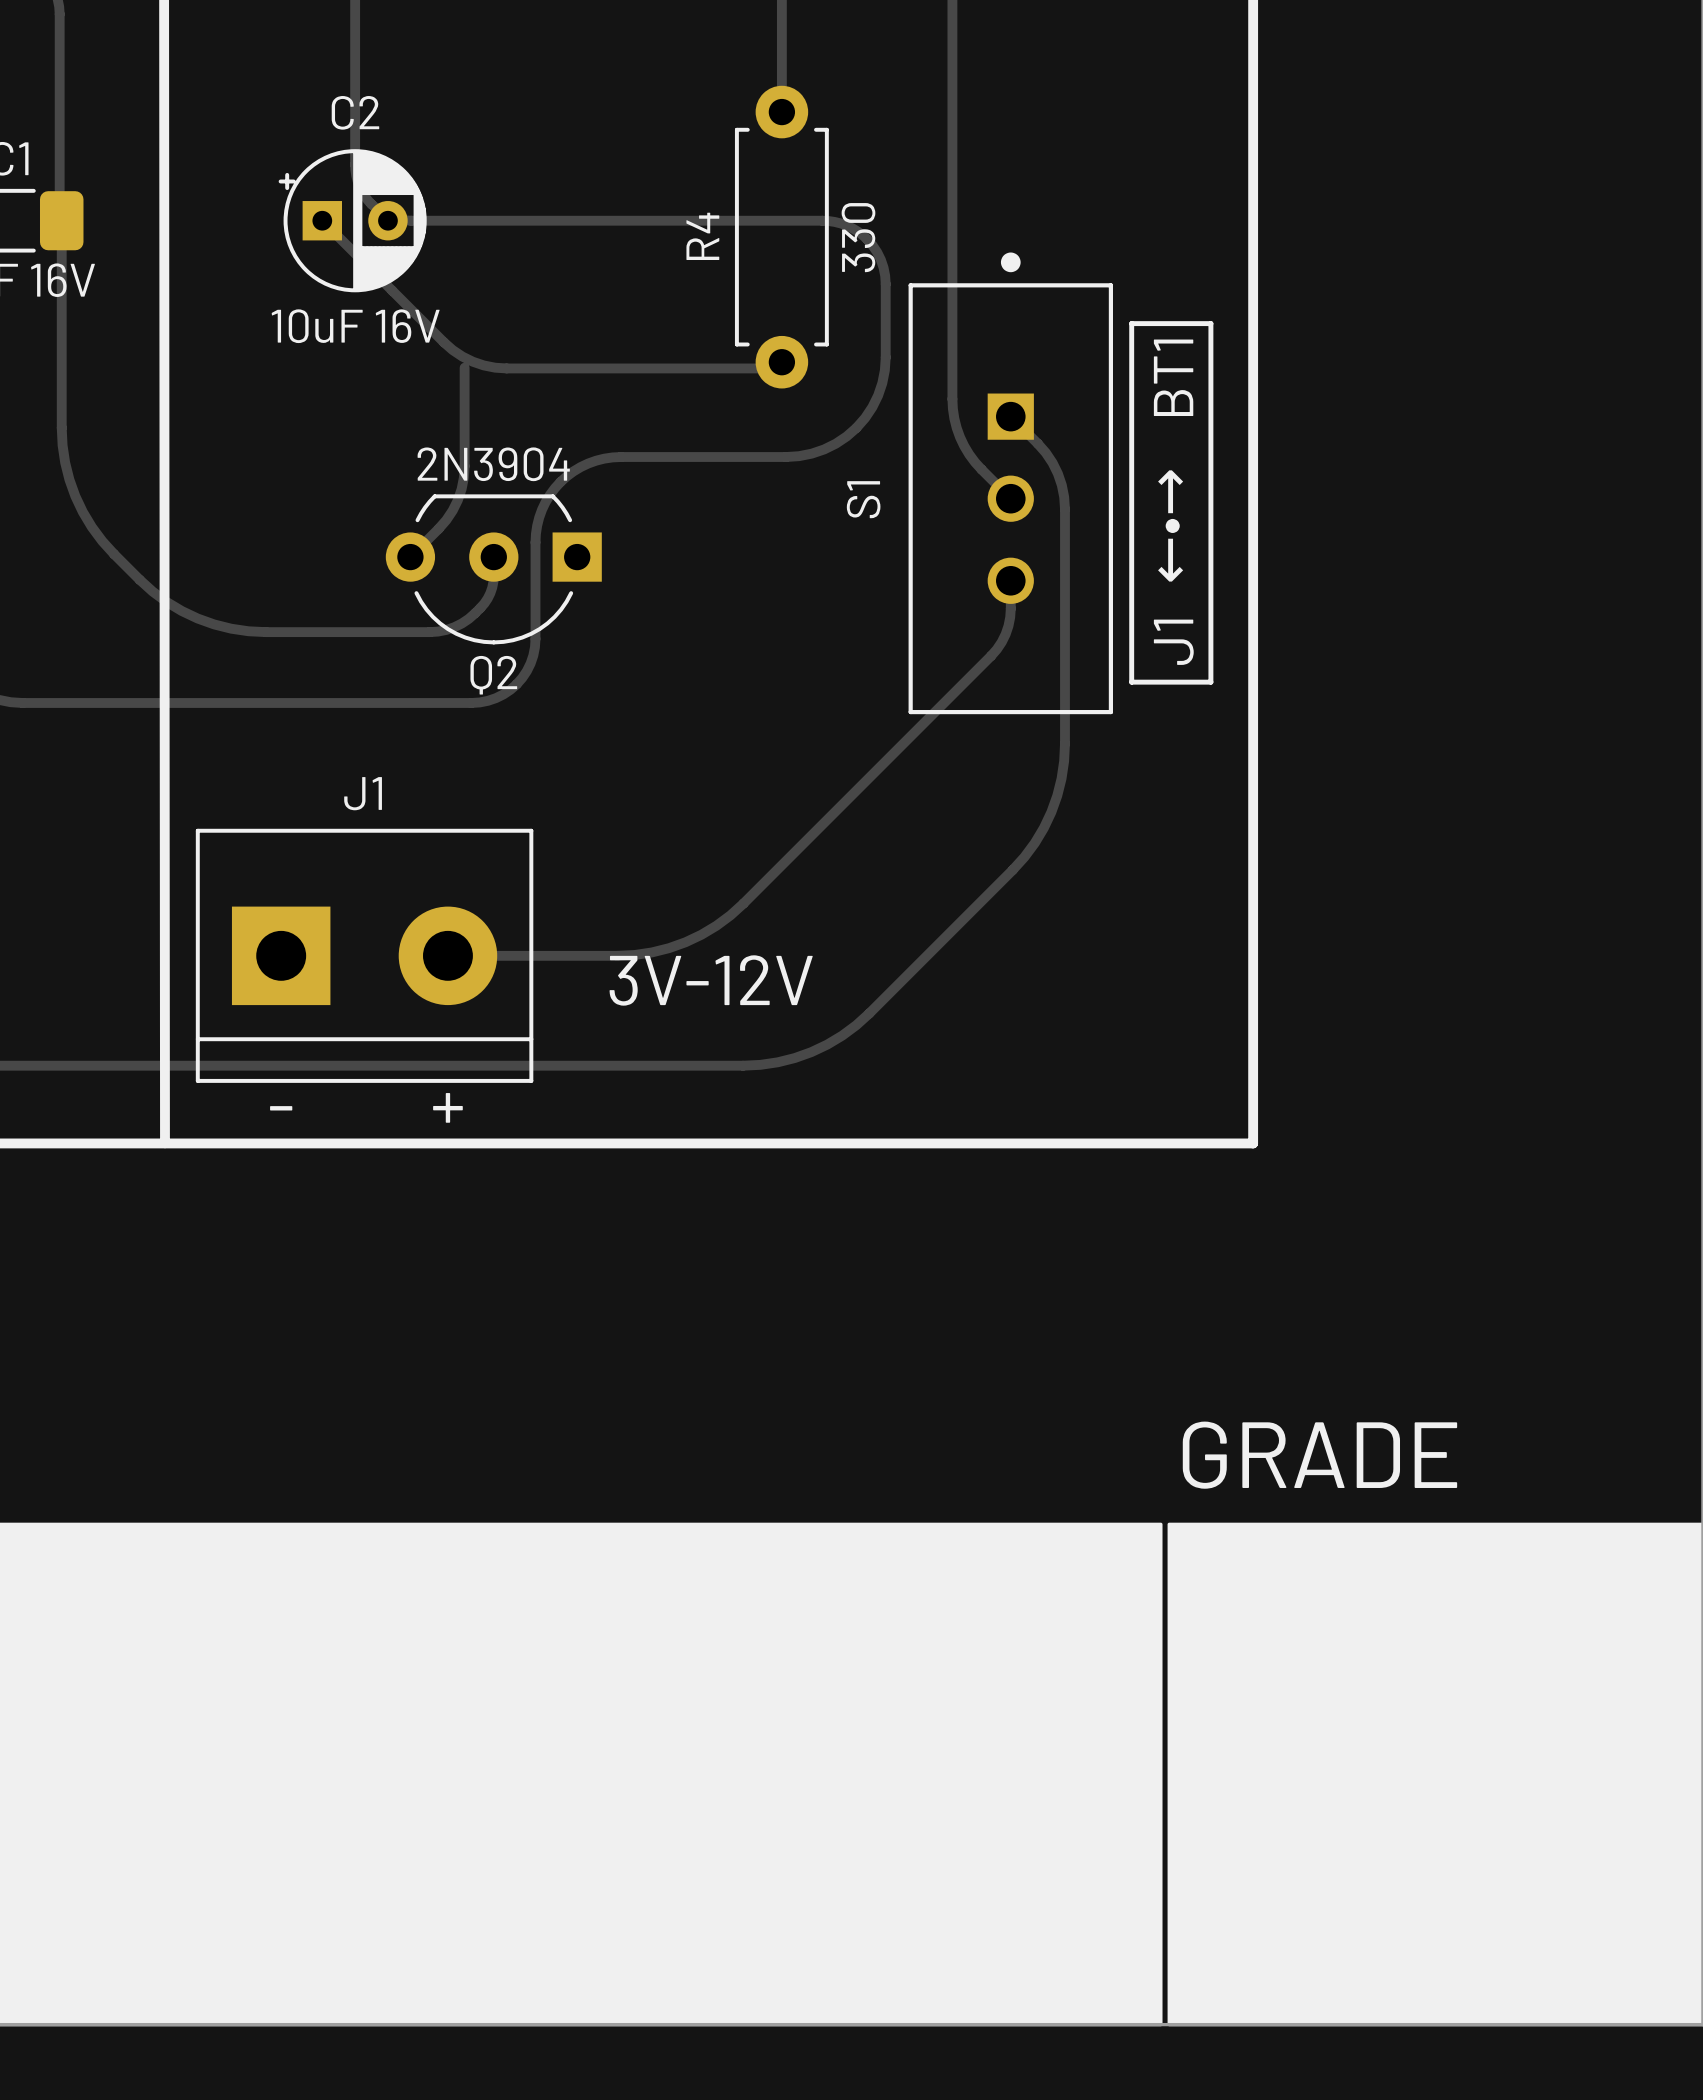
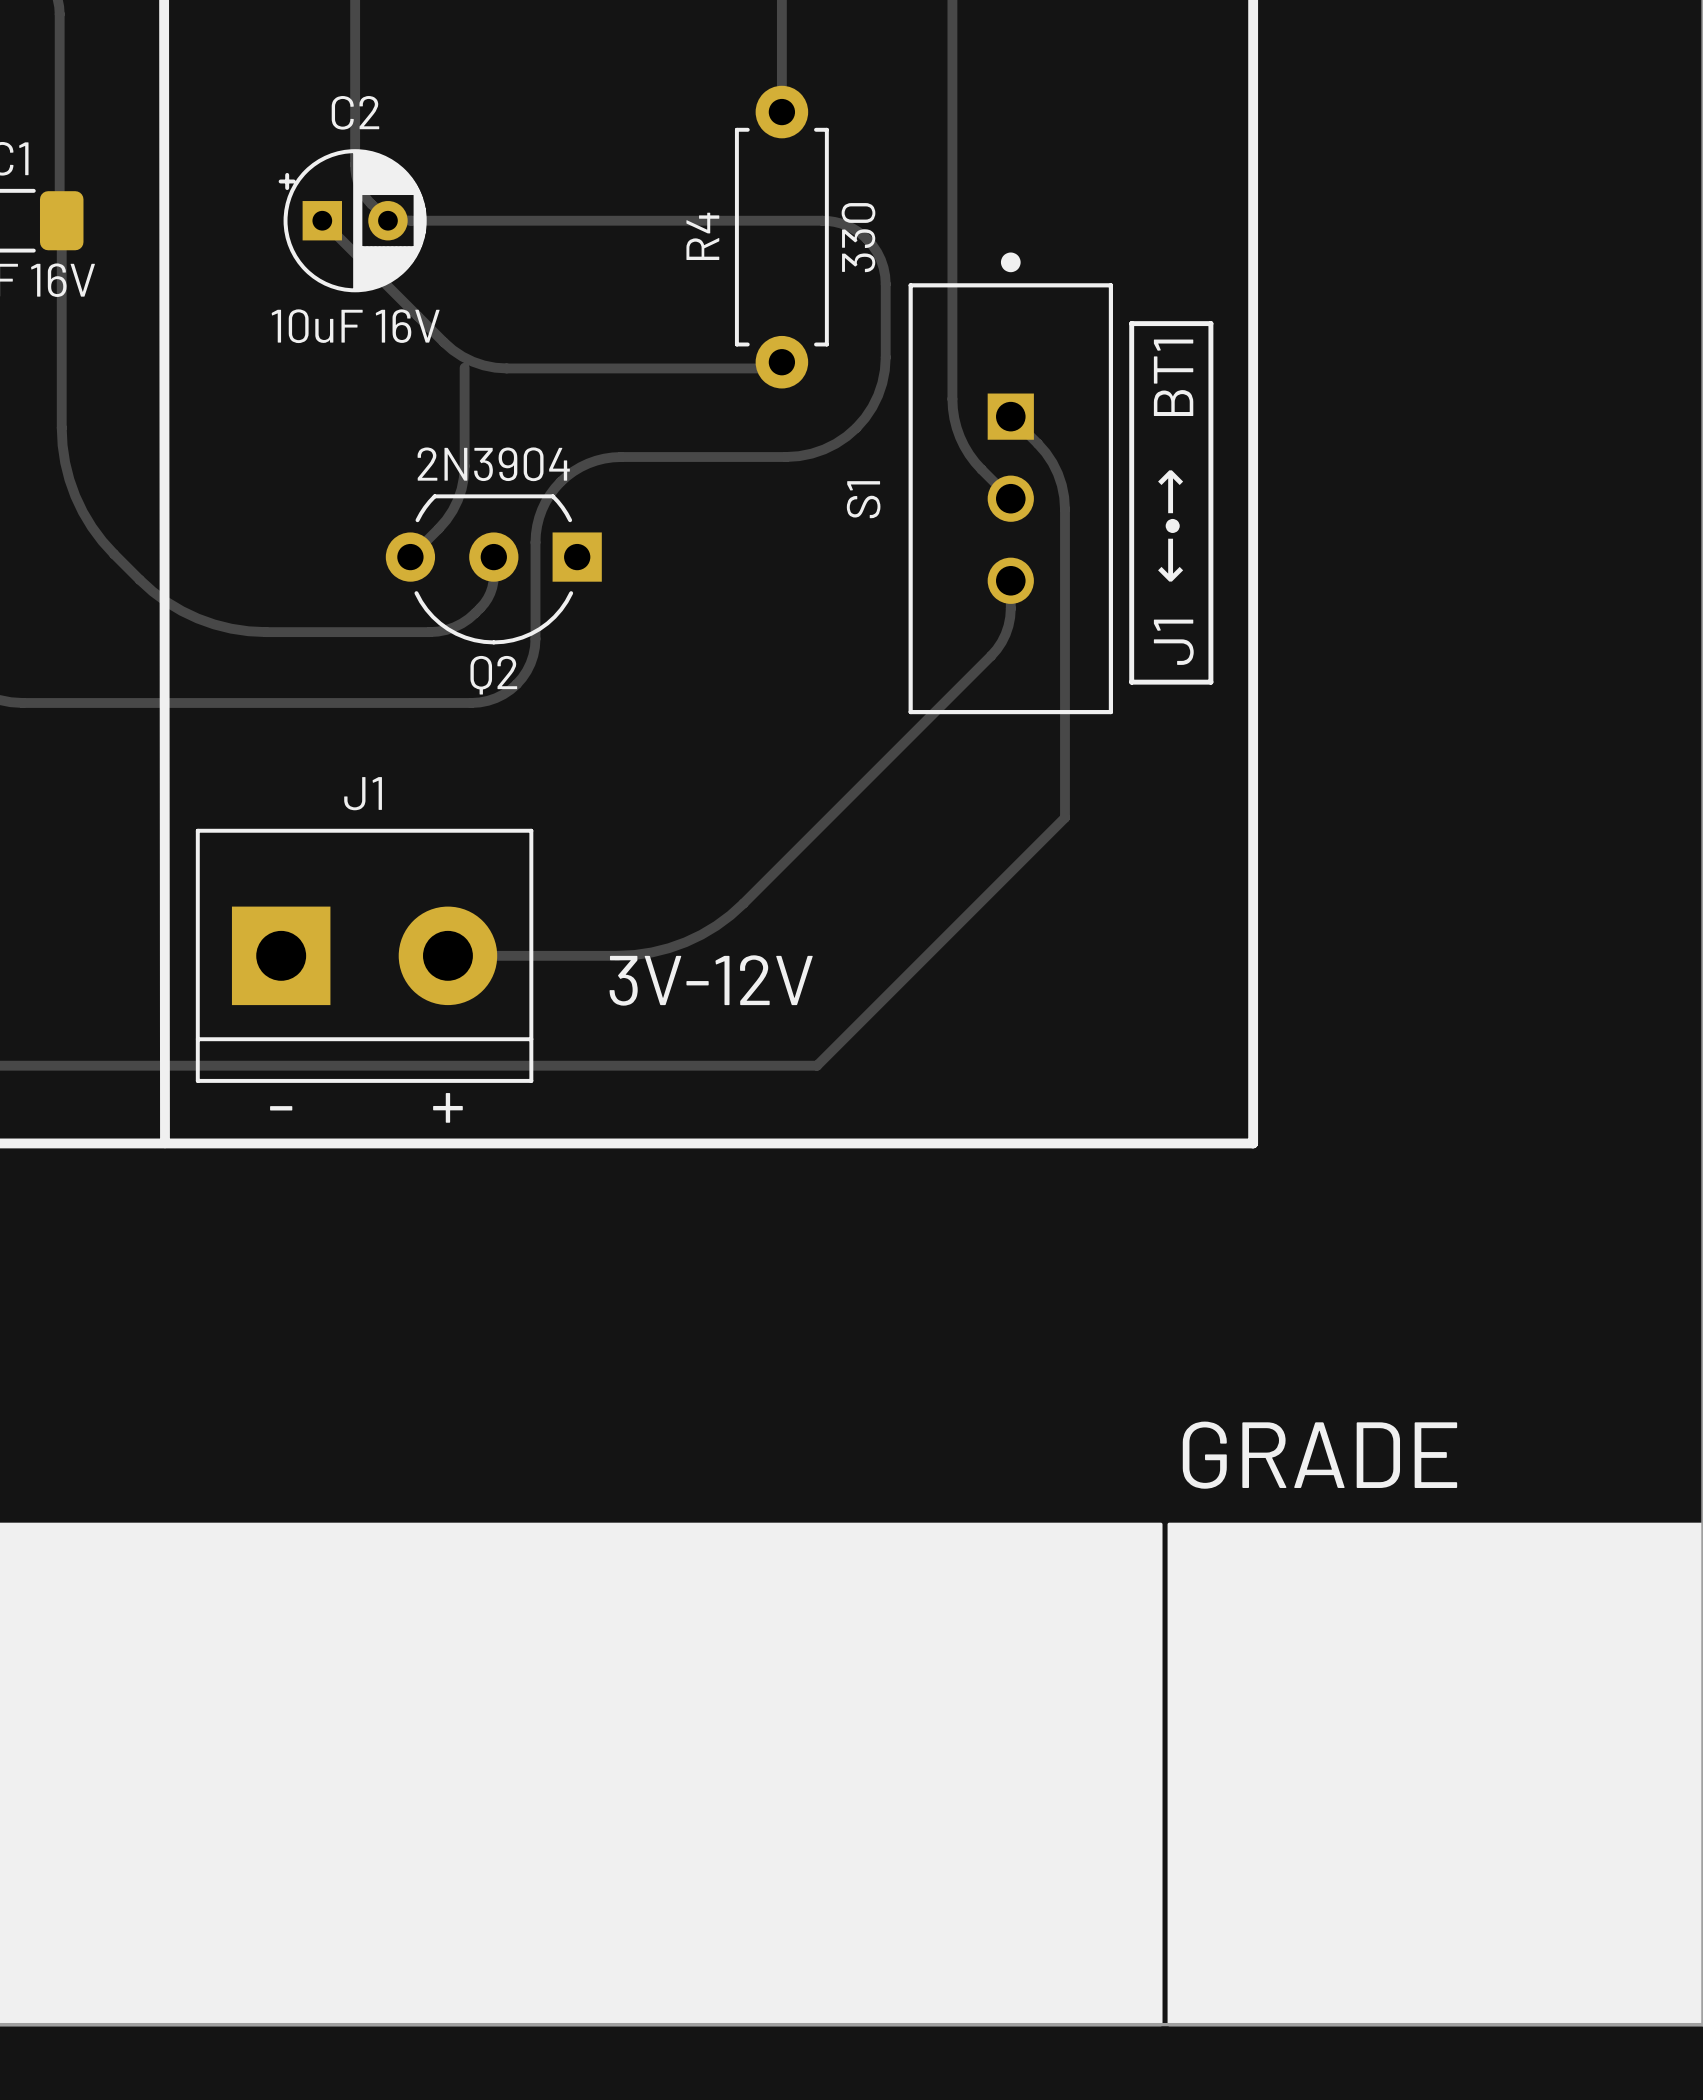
track: (1064, 743) (1061, 778) (1051, 812) (1034, 843) (1012, 870) -> (1064, 743) (1064, 817) (1012, 870)
track: (869, 1013) (842, 1035) (811, 1052) (777, 1062) (743, 1065) -> (869, 1013) (817, 1065) (743, 1065)

